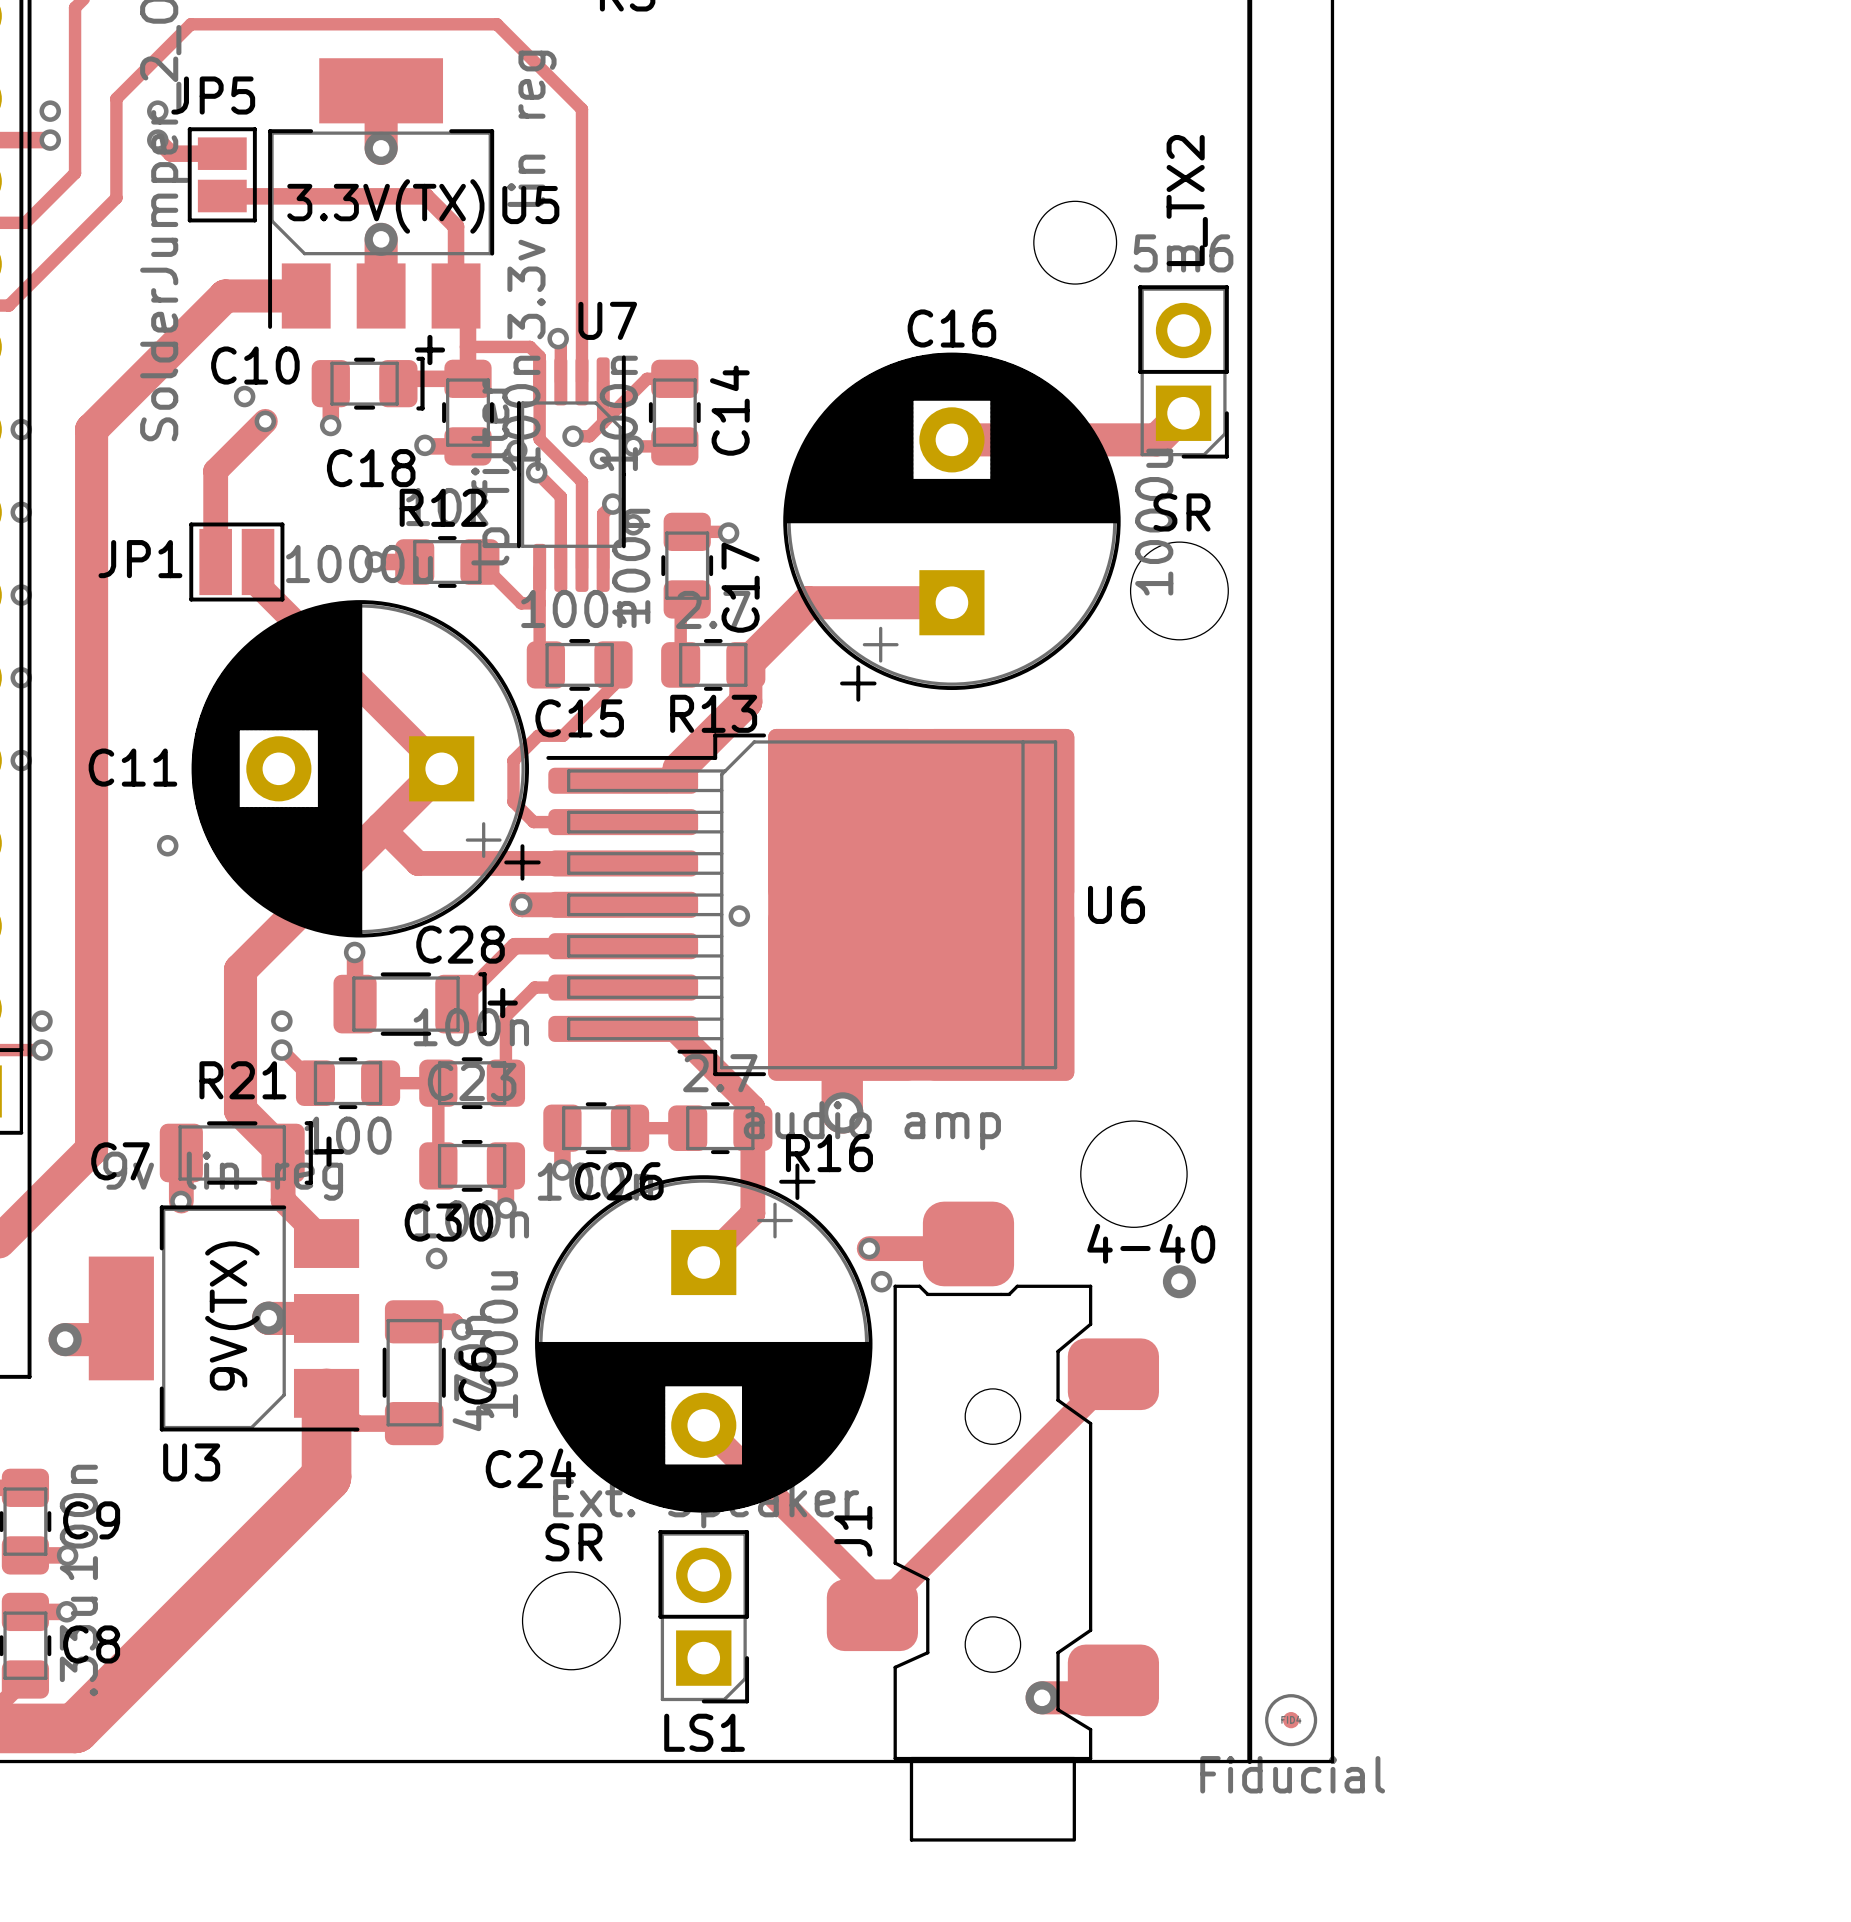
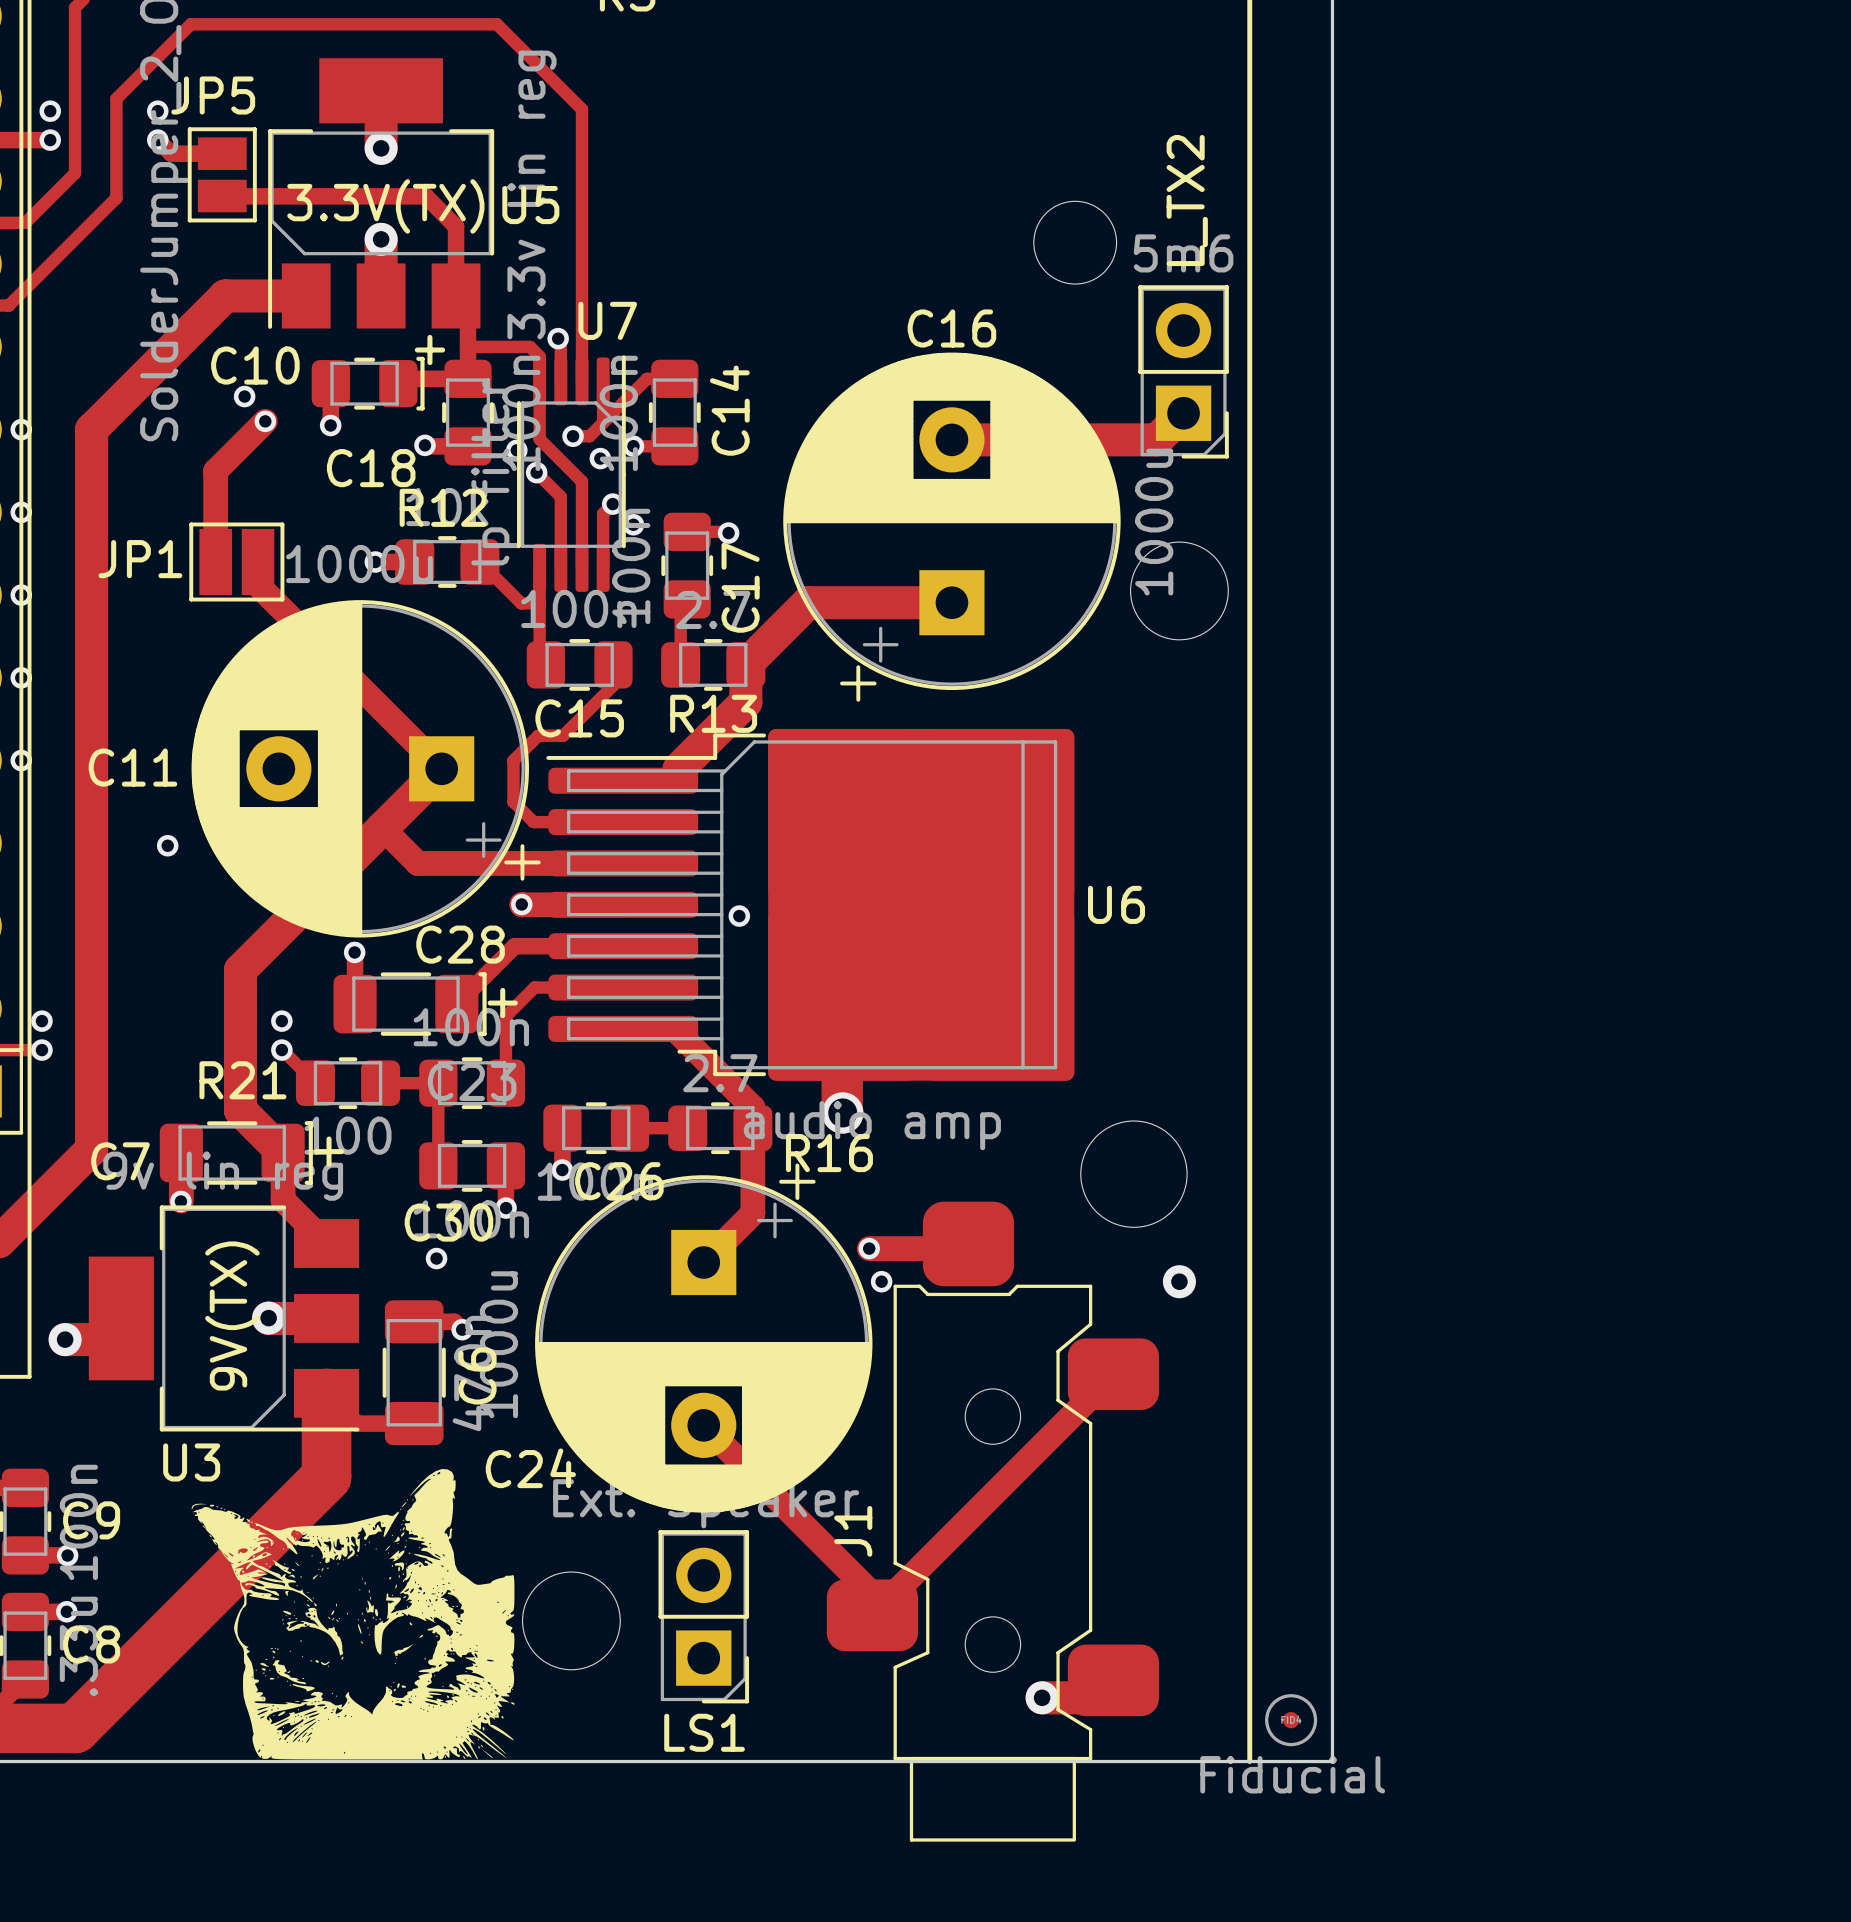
text: SR (1181, 512) -> none
text: 4-40 (1151, 1243) -> none
drawing: none -> [191, 1469, 515, 1760]
text: SR (573, 1542) -> none

